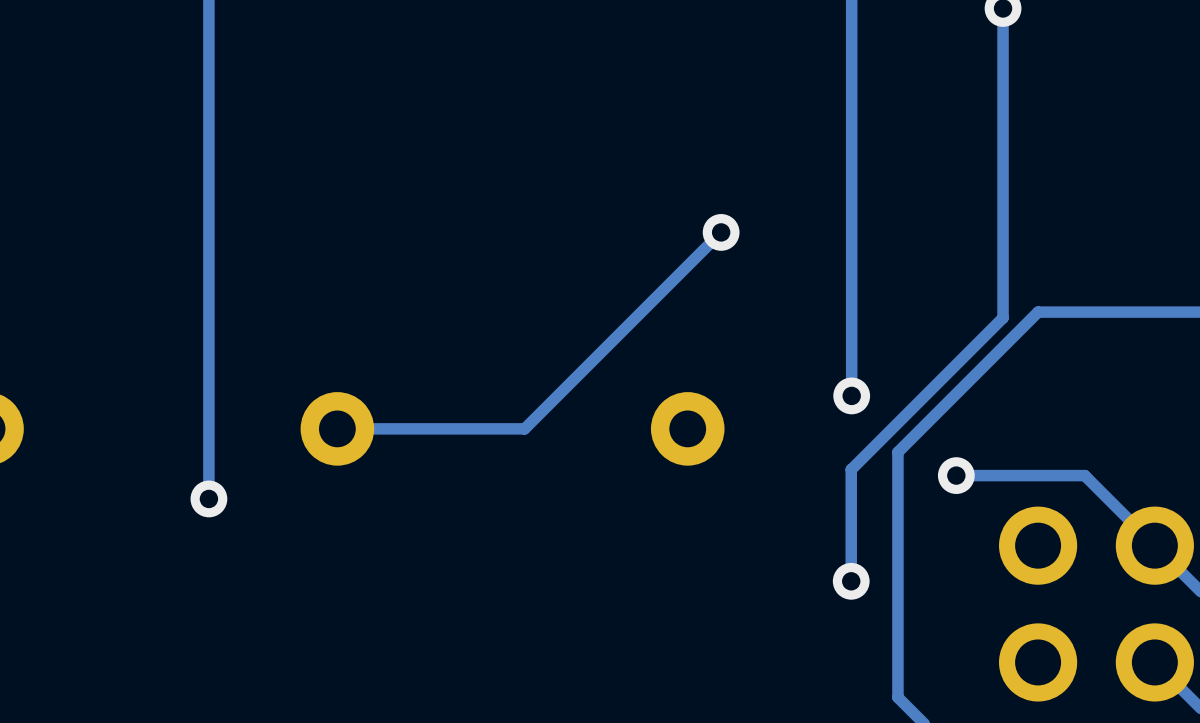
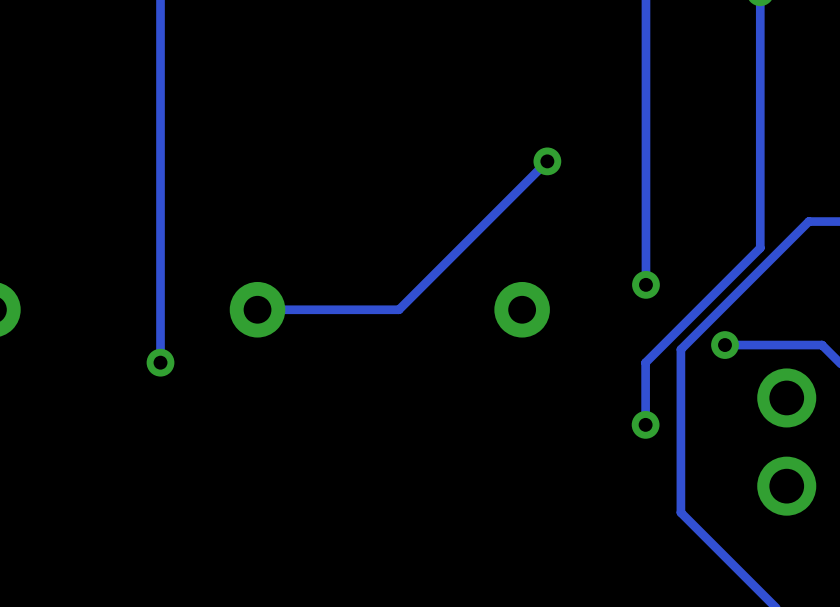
track: (1067, 312) (1038, 312) (1003, 347) -> (760, 225) (760, 248)
track: none -> (808, 221) (680, 349)
track: (1003, 317) (851, 469) (851, 498) -> none
track: (897, 452) (897, 481) -> (680, 327) (645, 362)

